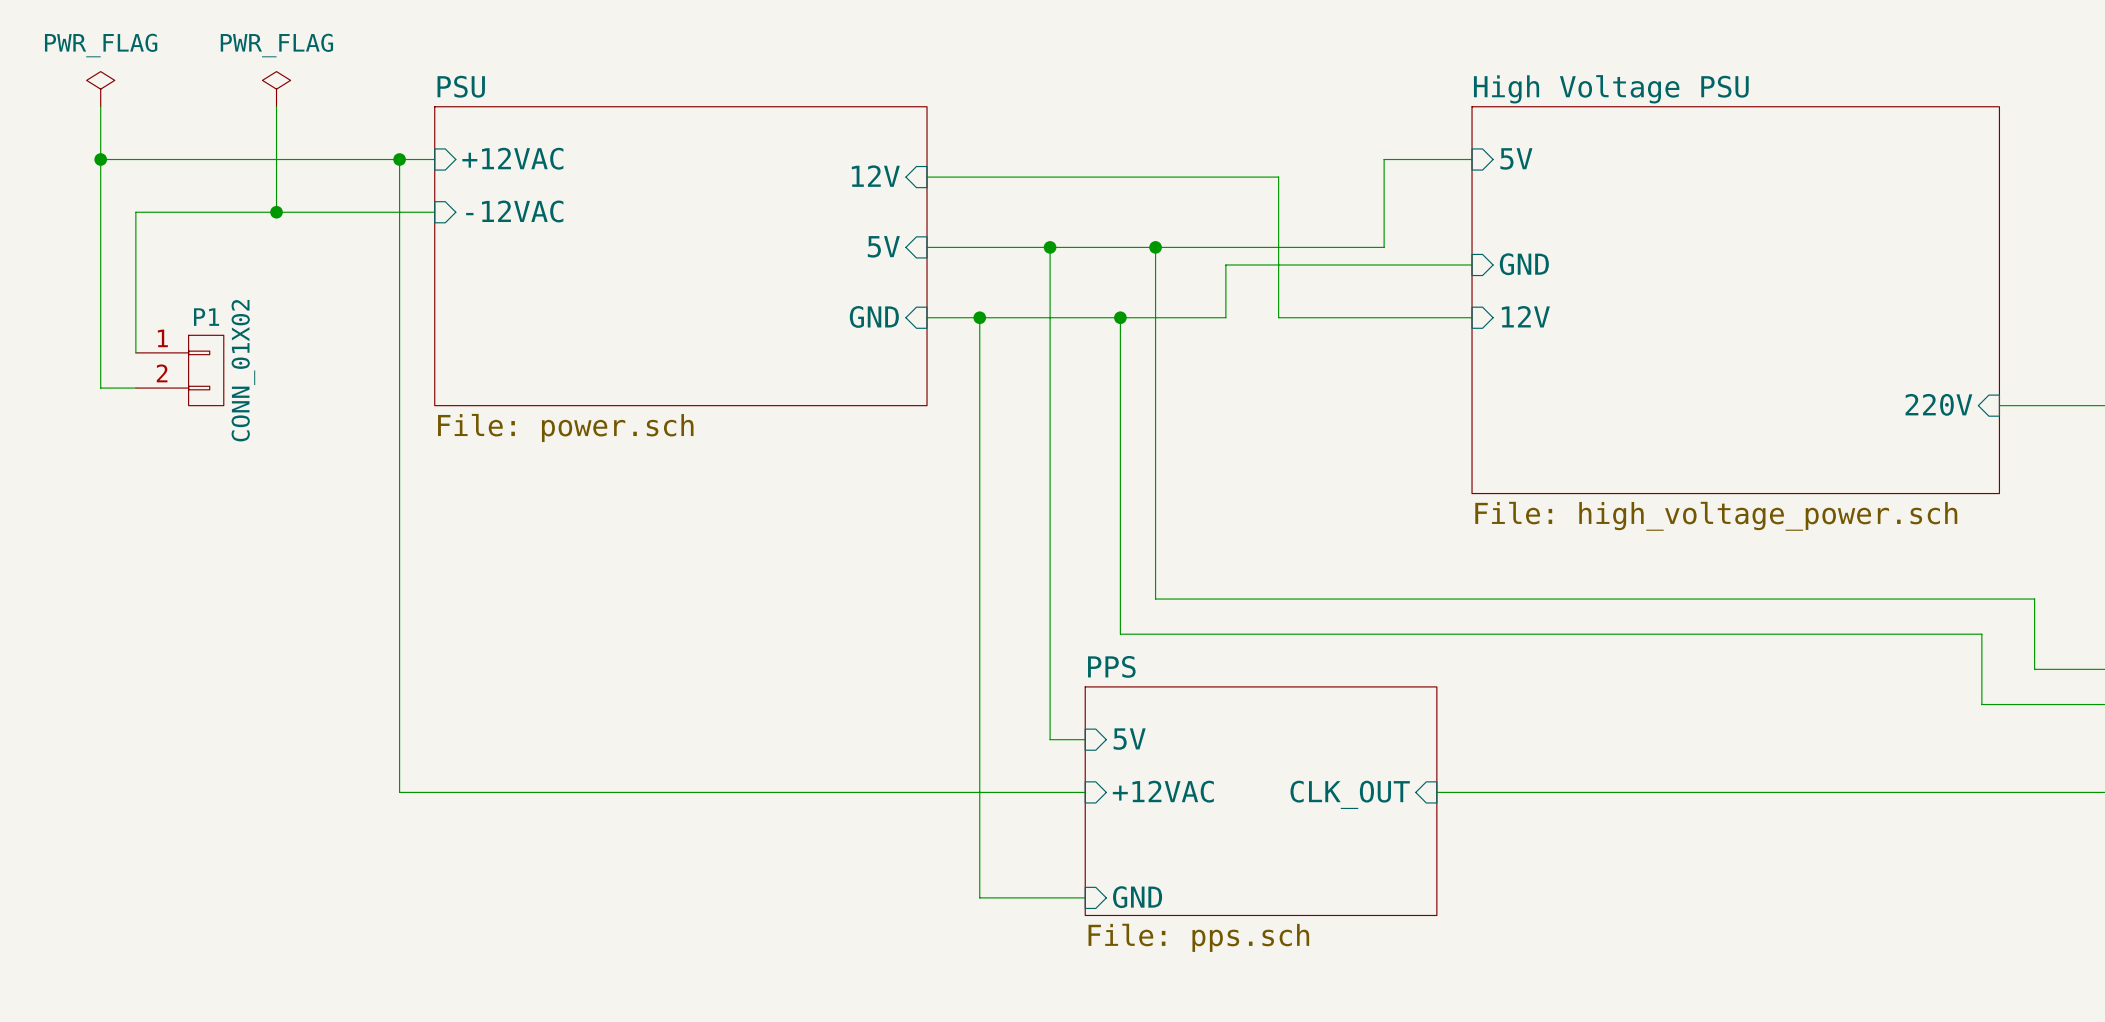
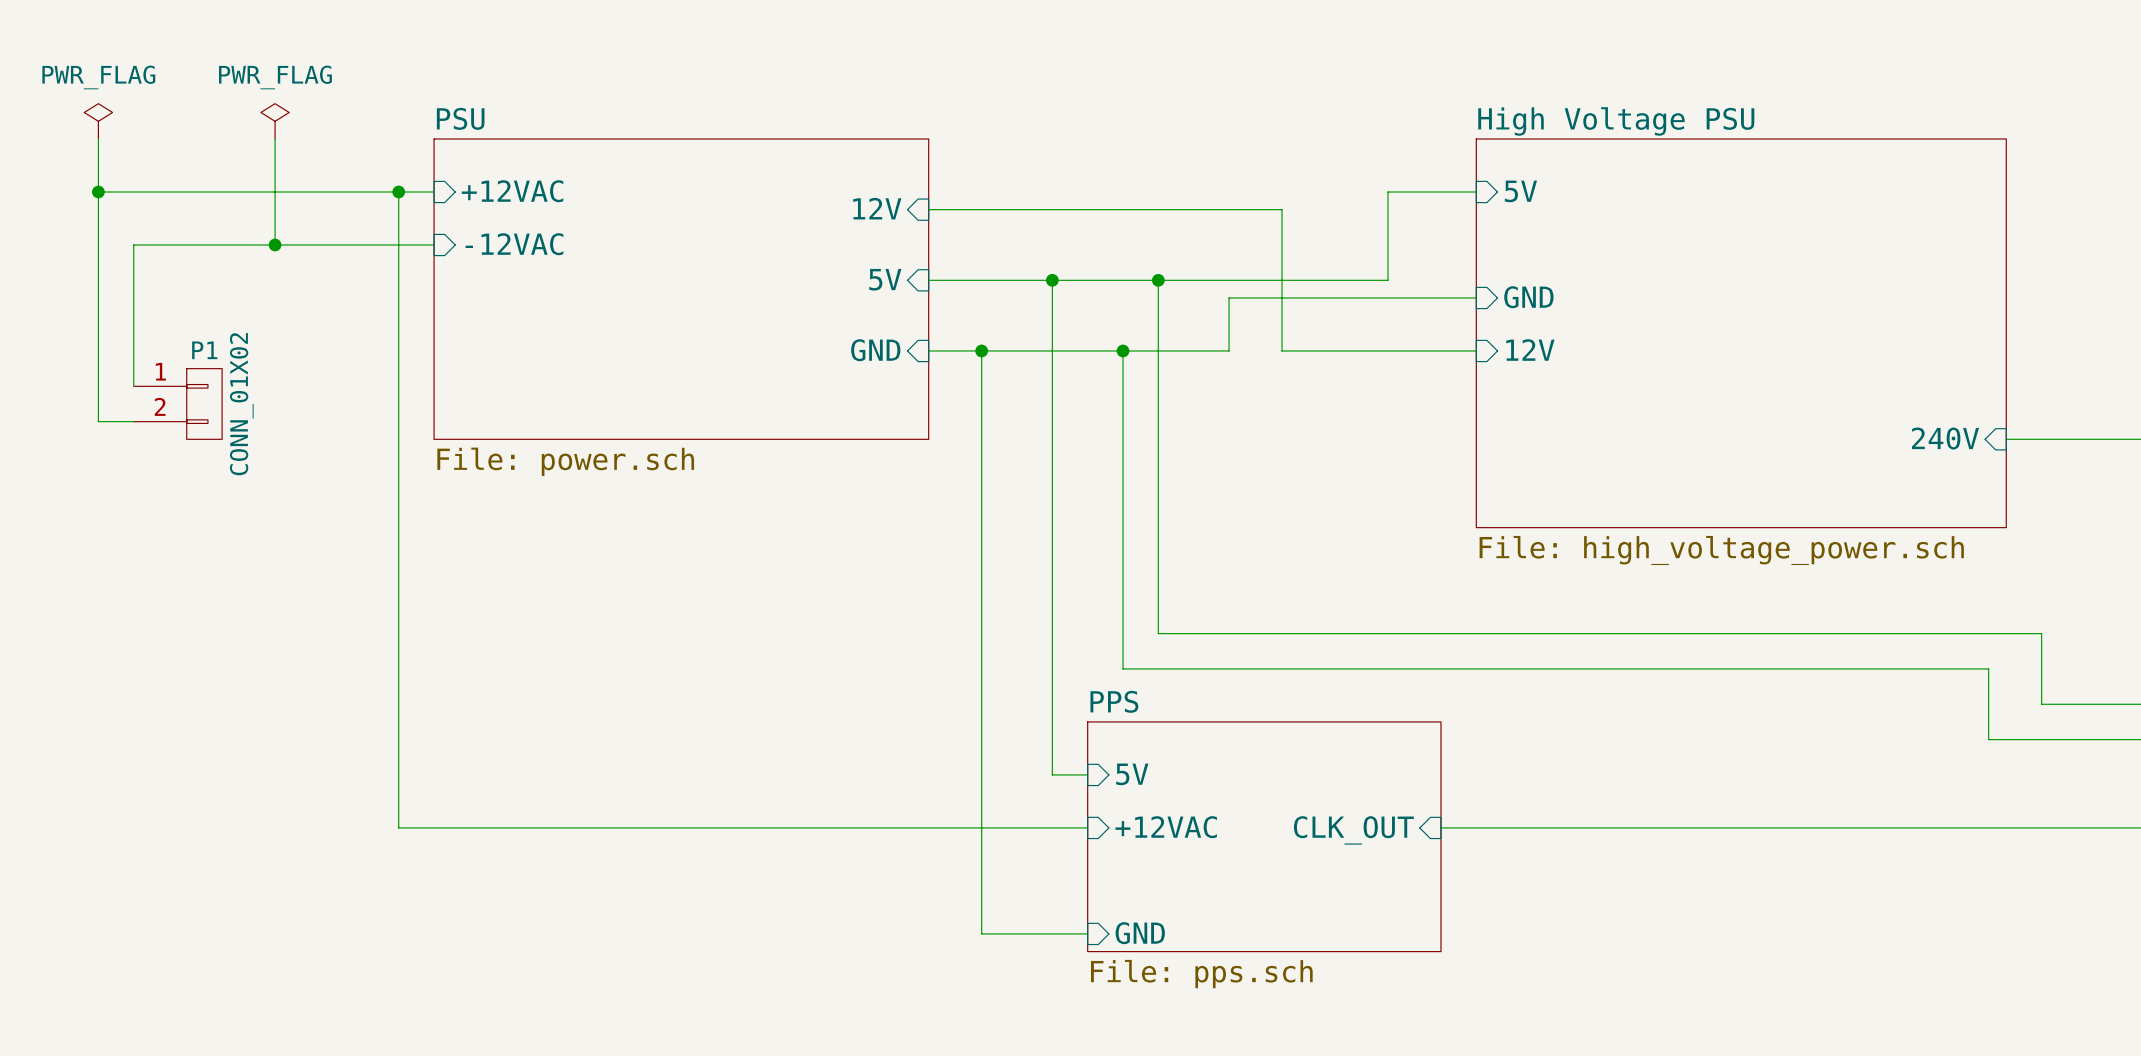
sheet pin: 220V (1938, 404) -> 240V (1945, 438)

